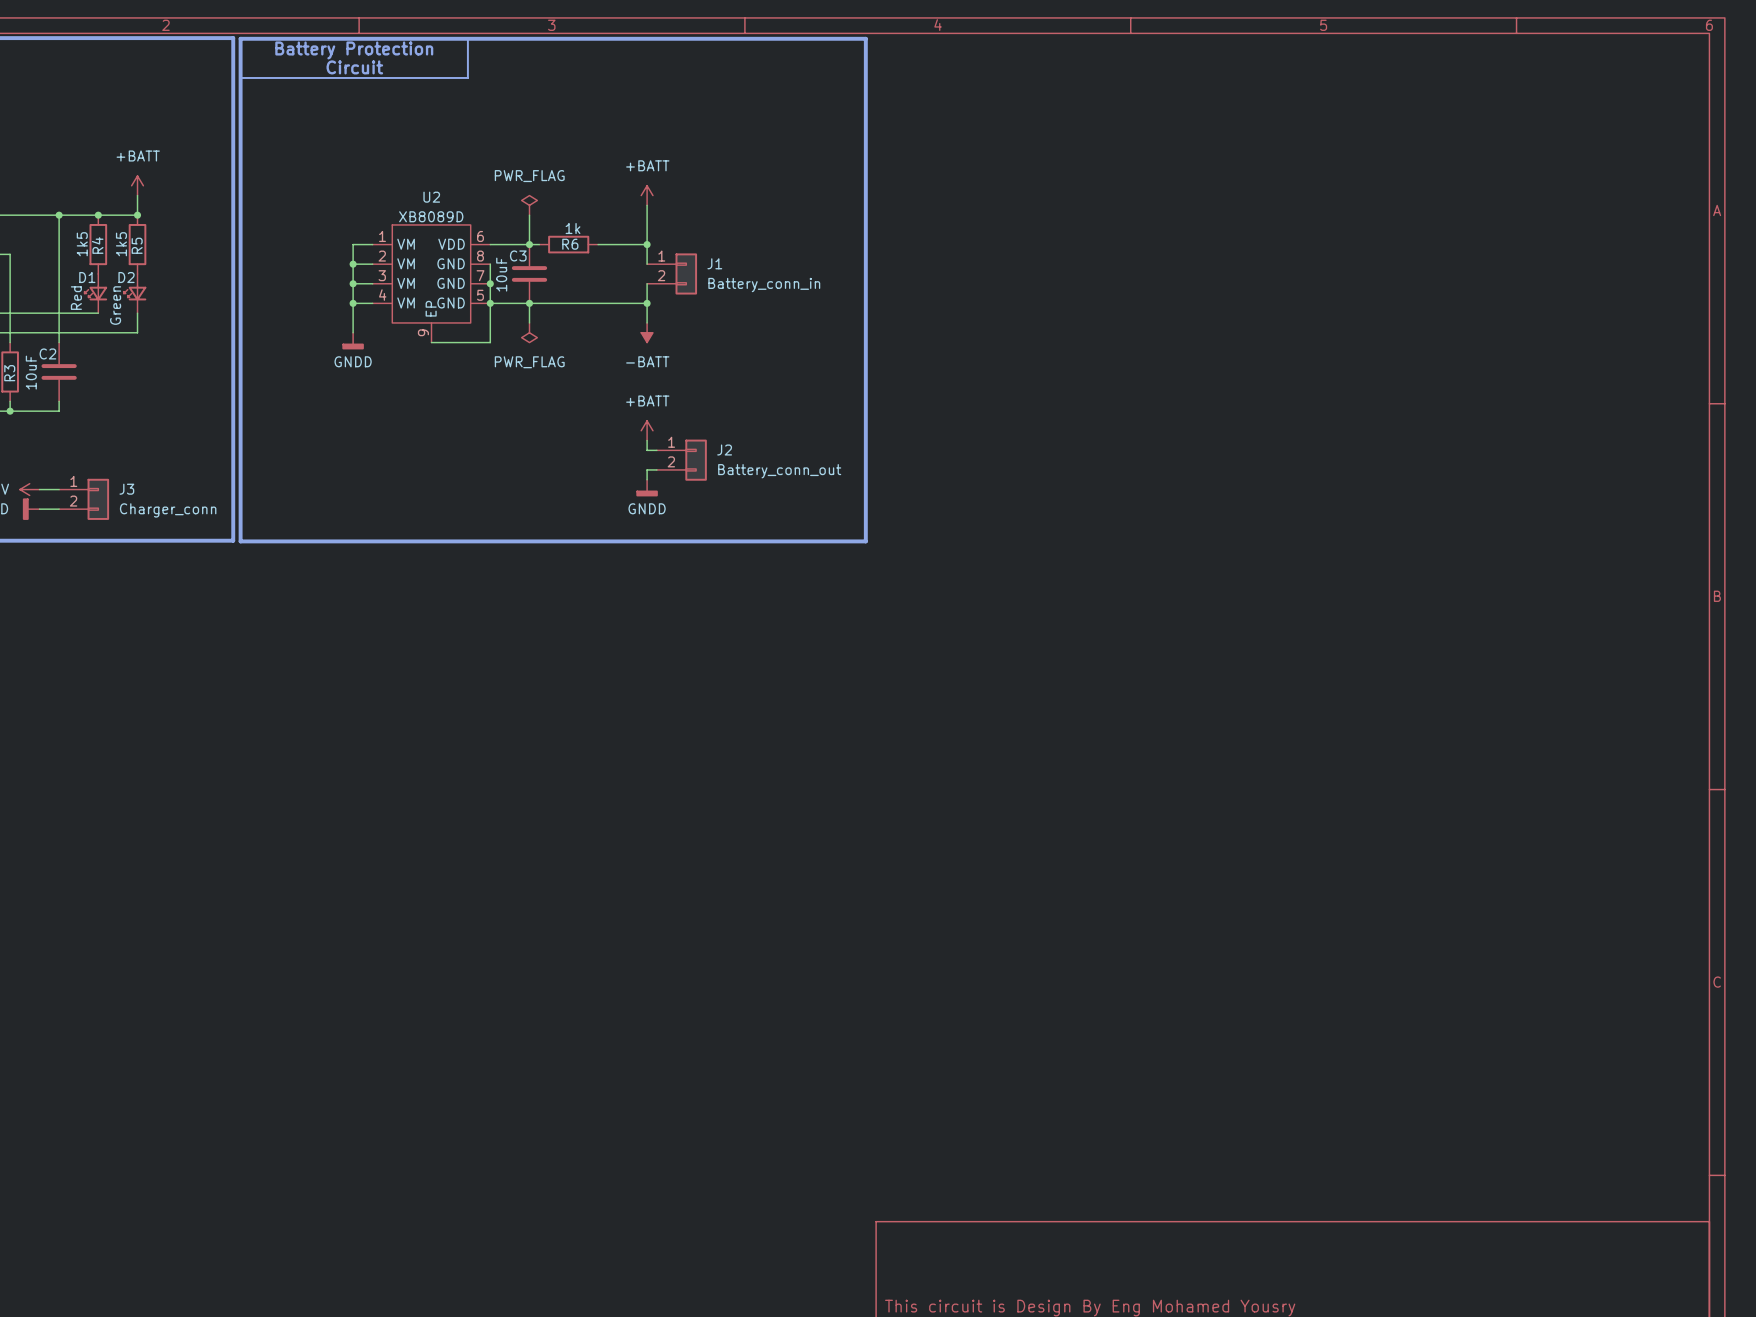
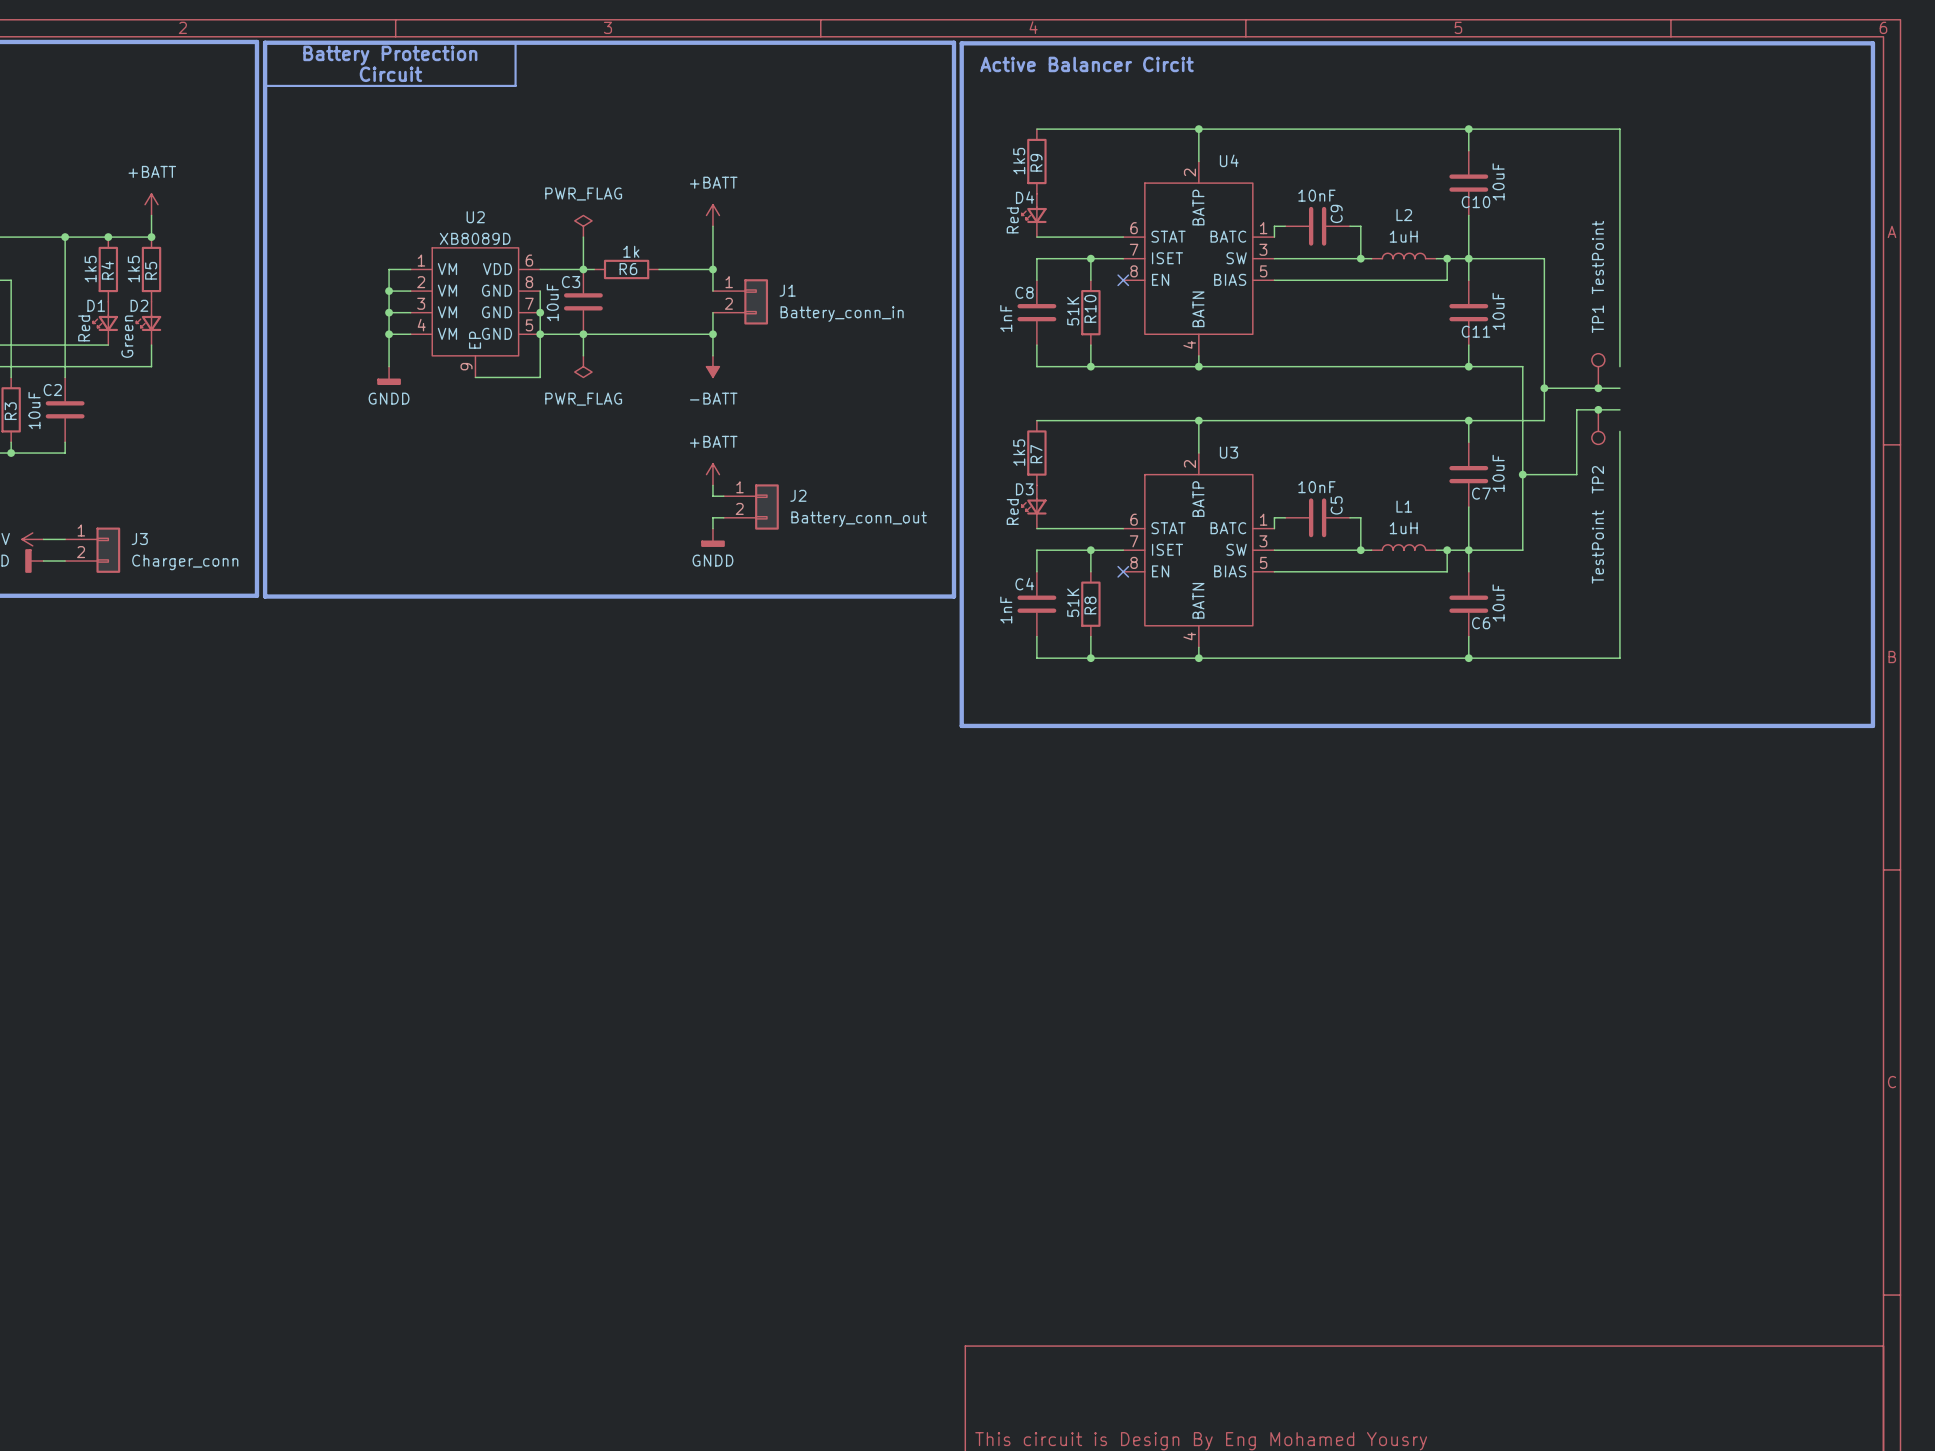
line: none -> (961, 43) (1872, 43) (1872, 725) (961, 725) (961, 43)
text: none -> Active Balancer Circit (1086, 64)
wire: none -> (1036, 129) (1619, 129) (1619, 366)
wire: none -> (1198, 129) (1198, 161)
junction: none -> (1198, 129)
wire: none -> (1468, 129) (1468, 150)
junction: none -> (1468, 129)
R9: none -> 1k5 (1036, 161)
C10: none -> 10uF (1468, 183)
D4: none -> Red (1034, 215)
wire: none -> (1468, 215) (1468, 280)
wire: none -> (1285, 226) (1274, 226) (1274, 237)
C9: none -> 10nF (1317, 226)
wire: none -> (1350, 226) (1360, 226) (1360, 258)
wire: none -> (1036, 237) (1123, 237)
L2: none -> 1uH (1404, 255)
wire: none -> (1090, 258) (1090, 280)
junction: none -> (1090, 258)
wire: none -> (1123, 258) (1036, 258) (1036, 280)
U4: none -> (1198, 258)
wire: none -> (1274, 258) (1371, 258)
junction: none -> (1360, 258)
wire: none -> (1436, 258) (1544, 258) (1544, 420) (1036, 420)
wire: none -> (1447, 258) (1447, 280) (1274, 280)
junction: none -> (1447, 258)
junction: none -> (1468, 258)
no-connect mark: none -> (1123, 280)
C8: none -> 1nF (1036, 312)
R10: none -> 51K (1090, 312)
C11: none -> 10uF (1468, 312)
wire: none -> (1036, 345) (1036, 366) (1522, 366) (1522, 550) (1436, 550)
wire: none -> (1090, 345) (1090, 366)
wire: none -> (1468, 345) (1468, 366)
wire: none -> (1198, 355) (1198, 366)
junction: none -> (1090, 366)
junction: none -> (1198, 366)
junction: none -> (1468, 366)
TP1: none -> TestPoint (1598, 370)
wire: none -> (1544, 388) (1619, 388)
junction: none -> (1544, 388)
junction: none -> (1598, 388)
junction: none -> (1598, 409)
wire: none -> (1619, 409) (1576, 409) (1576, 474) (1522, 474)
wire: none -> (1198, 420) (1198, 453)
junction: none -> (1198, 420)
wire: none -> (1468, 420) (1468, 442)
junction: none -> (1468, 420)
TP2: none -> TestPoint (1598, 427)
wire: none -> (1619, 431) (1619, 658) (1036, 658) (1036, 636)
R7: none -> 1k5 (1036, 453)
C7: none -> 10uF (1468, 474)
junction: none -> (1522, 474)
D3: none -> Red (1034, 507)
wire: none -> (1468, 507) (1468, 571)
wire: none -> (1285, 517) (1274, 517) (1274, 528)
C5: none -> 10nF (1317, 517)
wire: none -> (1350, 517) (1360, 517) (1360, 550)
wire: none -> (1036, 528) (1123, 528)
L1: none -> 1uH (1404, 547)
wire: none -> (1090, 550) (1090, 571)
junction: none -> (1090, 550)
wire: none -> (1123, 550) (1036, 550) (1036, 571)
U3: none -> (1198, 550)
wire: none -> (1274, 550) (1371, 550)
junction: none -> (1360, 550)
wire: none -> (1447, 550) (1447, 571) (1274, 571)
junction: none -> (1447, 550)
junction: none -> (1468, 550)
no-connect mark: none -> (1123, 571)
C4: none -> 1nF (1036, 604)
R8: none -> 51K (1090, 604)
C6: none -> 10uF (1468, 604)
wire: none -> (1090, 636) (1090, 658)
wire: none -> (1468, 636) (1468, 658)
wire: none -> (1198, 647) (1198, 658)
junction: none -> (1090, 658)
junction: none -> (1198, 658)
junction: none -> (1468, 658)

